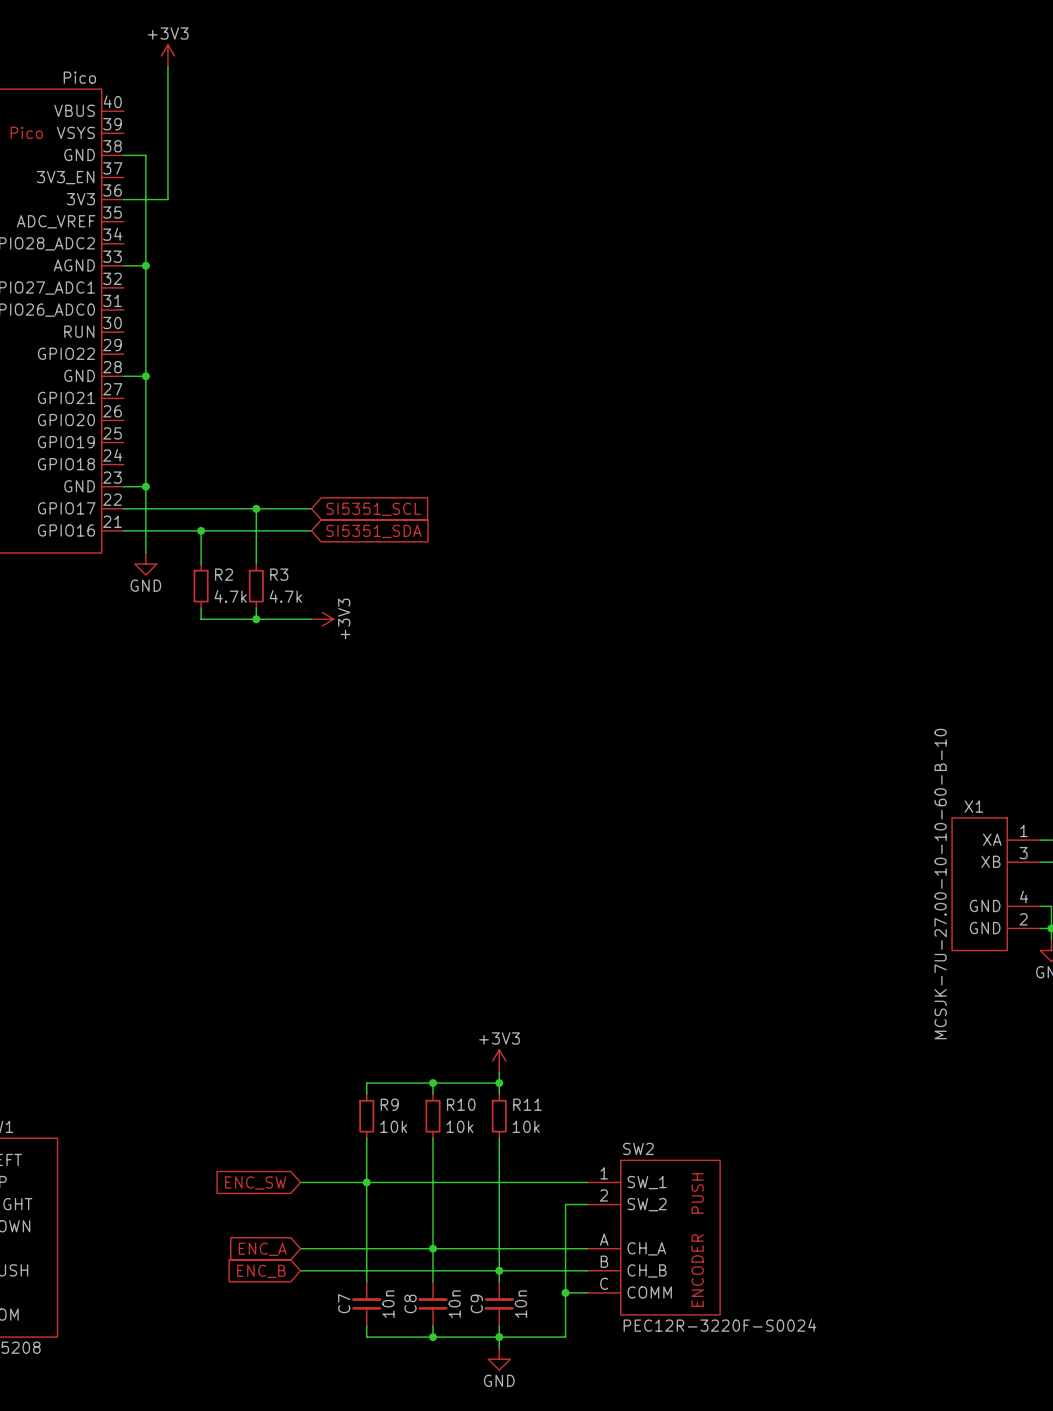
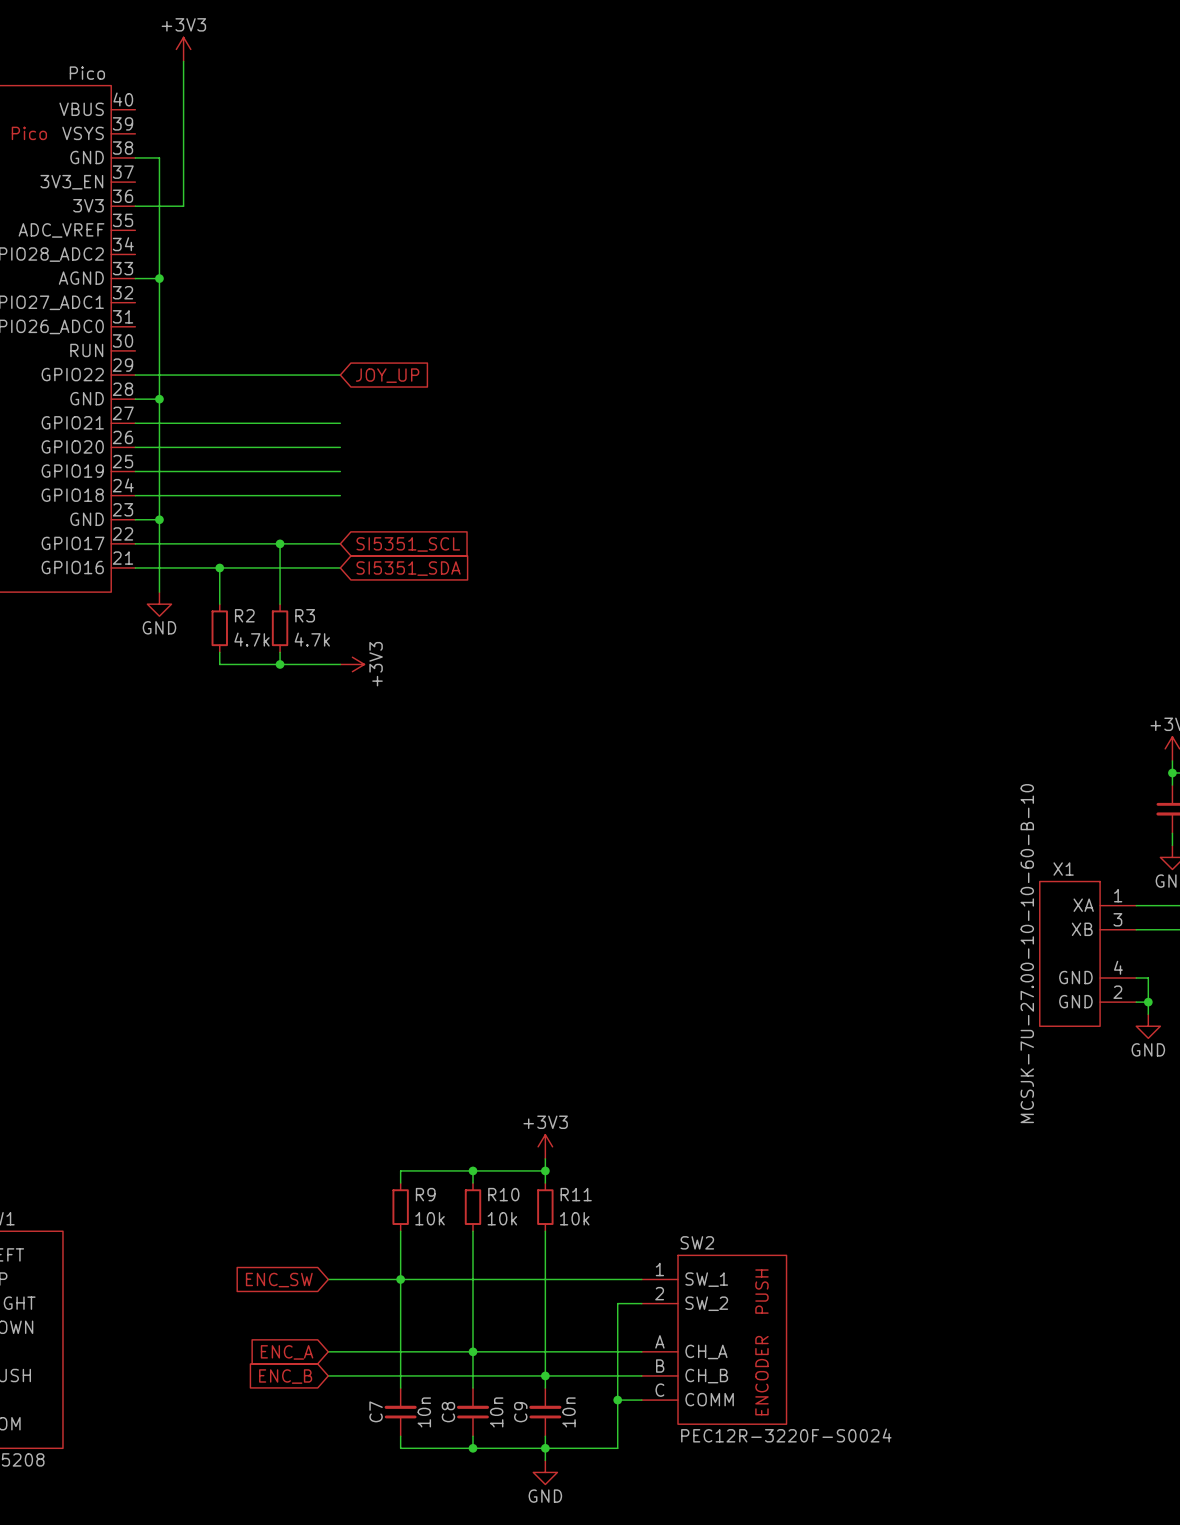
wire: none -> (135, 375) (340, 375)
global label: none -> JOY_UP (387, 375)
wire: none -> (135, 423) (340, 423)
wire: none -> (135, 447) (340, 447)
wire: none -> (135, 471) (340, 471)
wire: none -> (135, 495) (340, 495)

